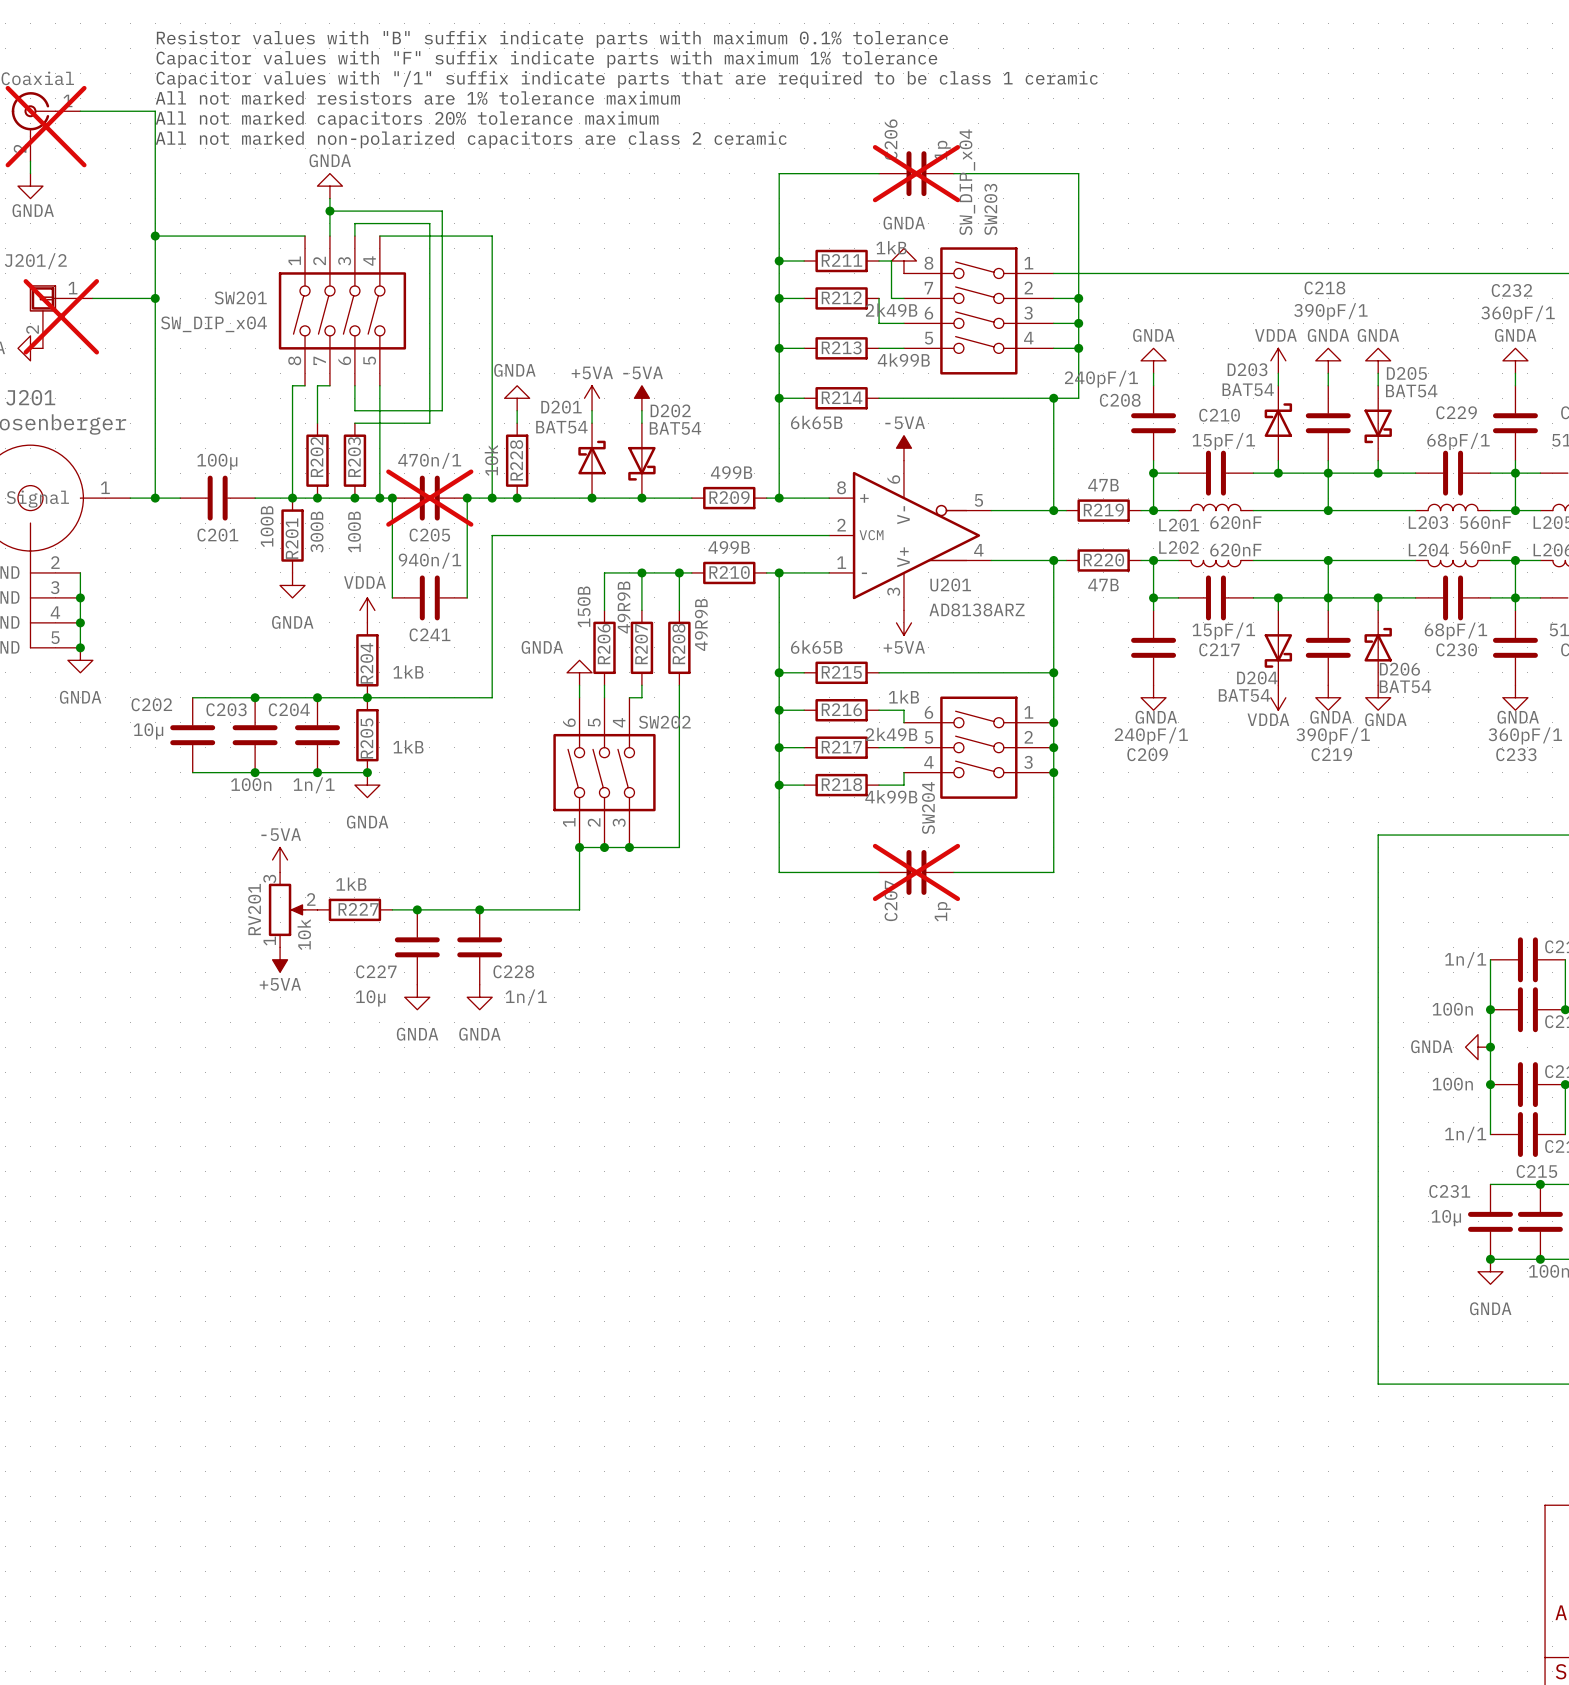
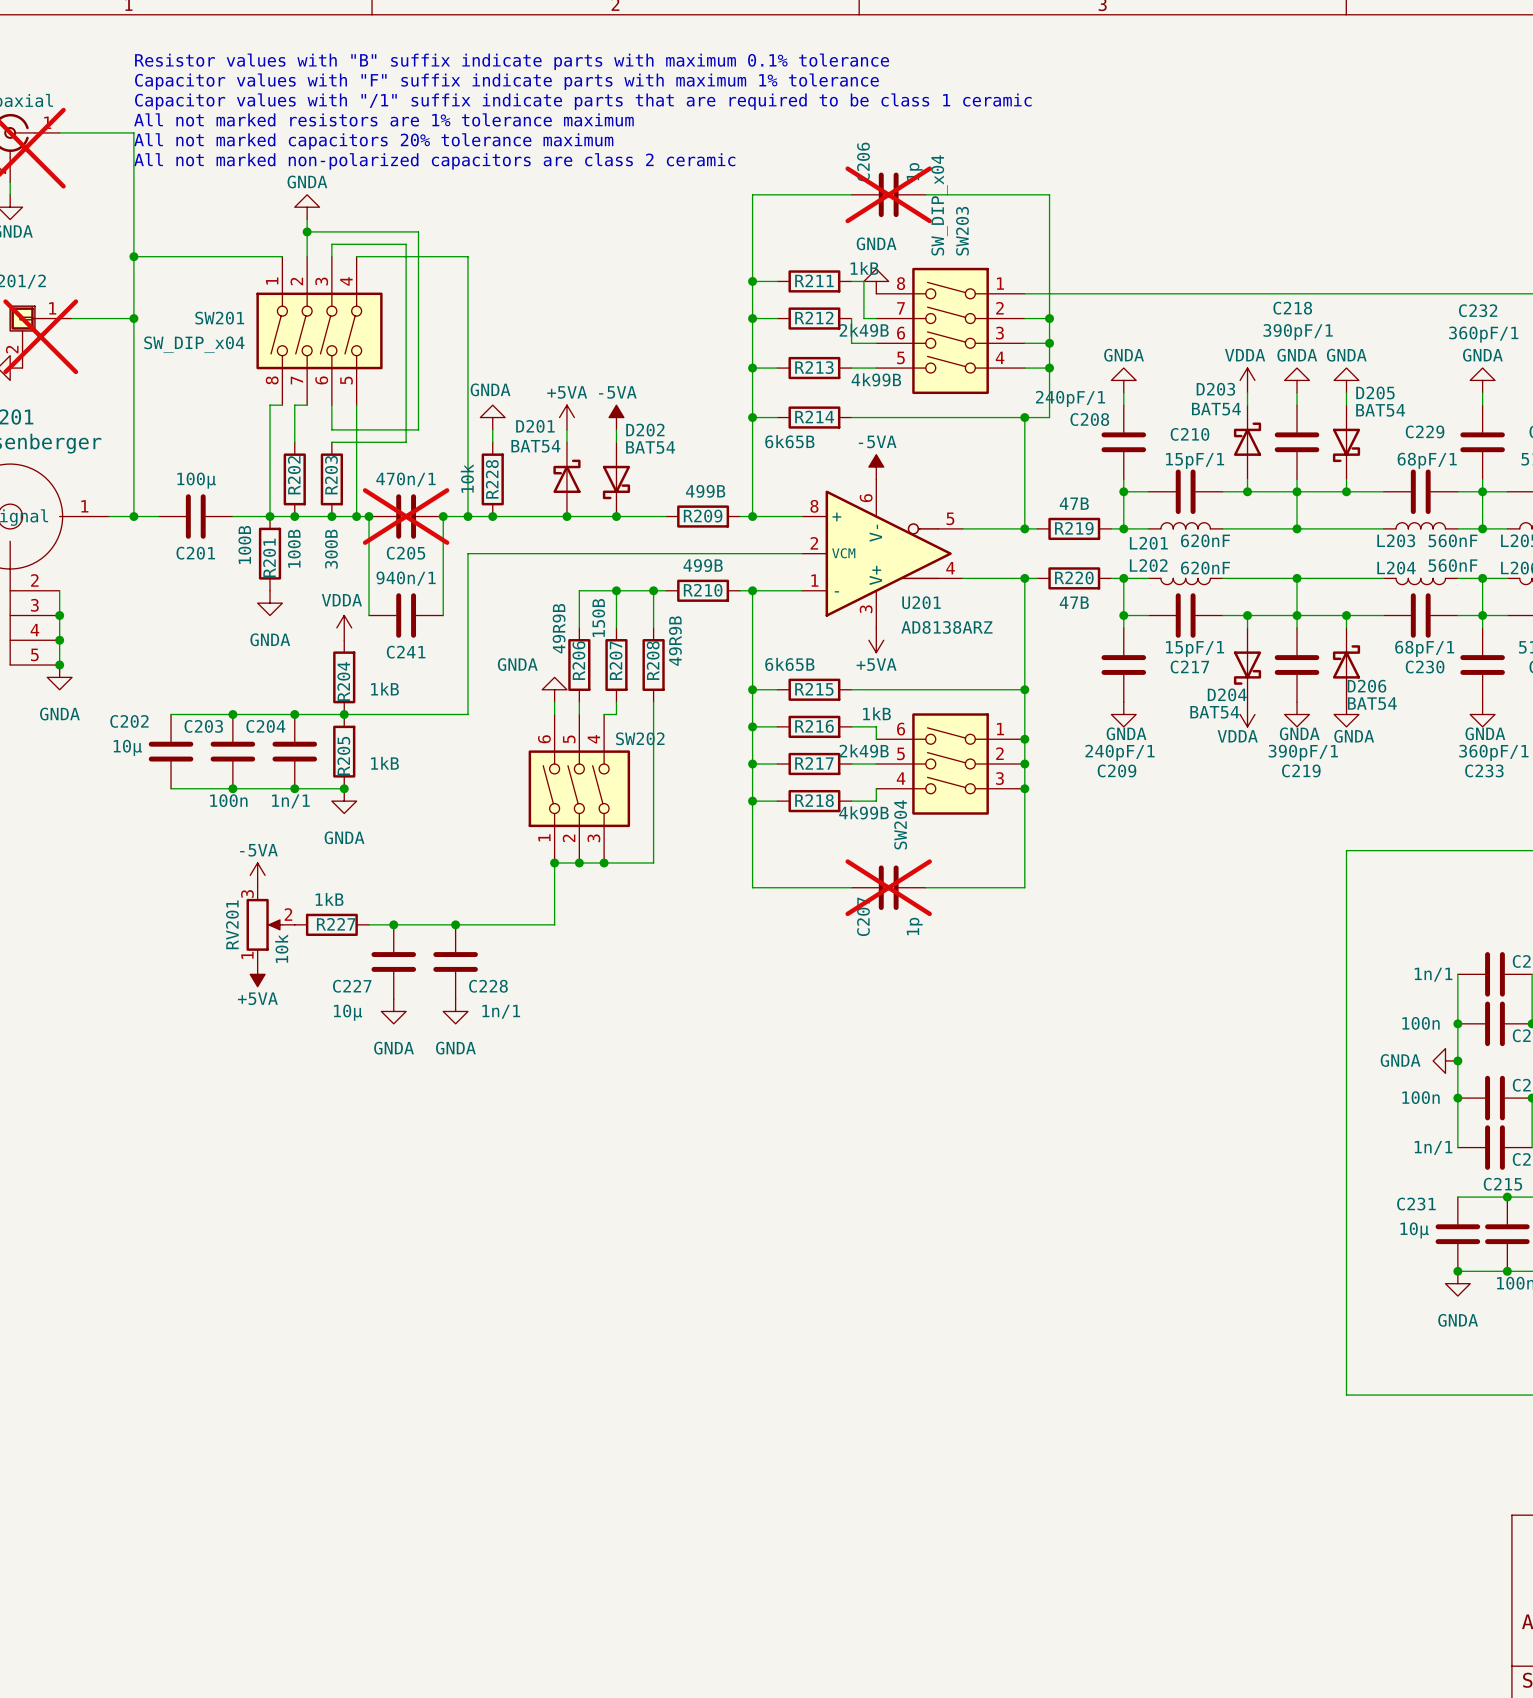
R202 value: 300B (317, 532) -> 100B (294, 548)
R203 value: 100B (354, 532) -> 300B (331, 549)
R206 value: 150B (584, 606) -> 49R9B (559, 628)
R207 value: 49R9B (623, 607) -> 150B (598, 618)

